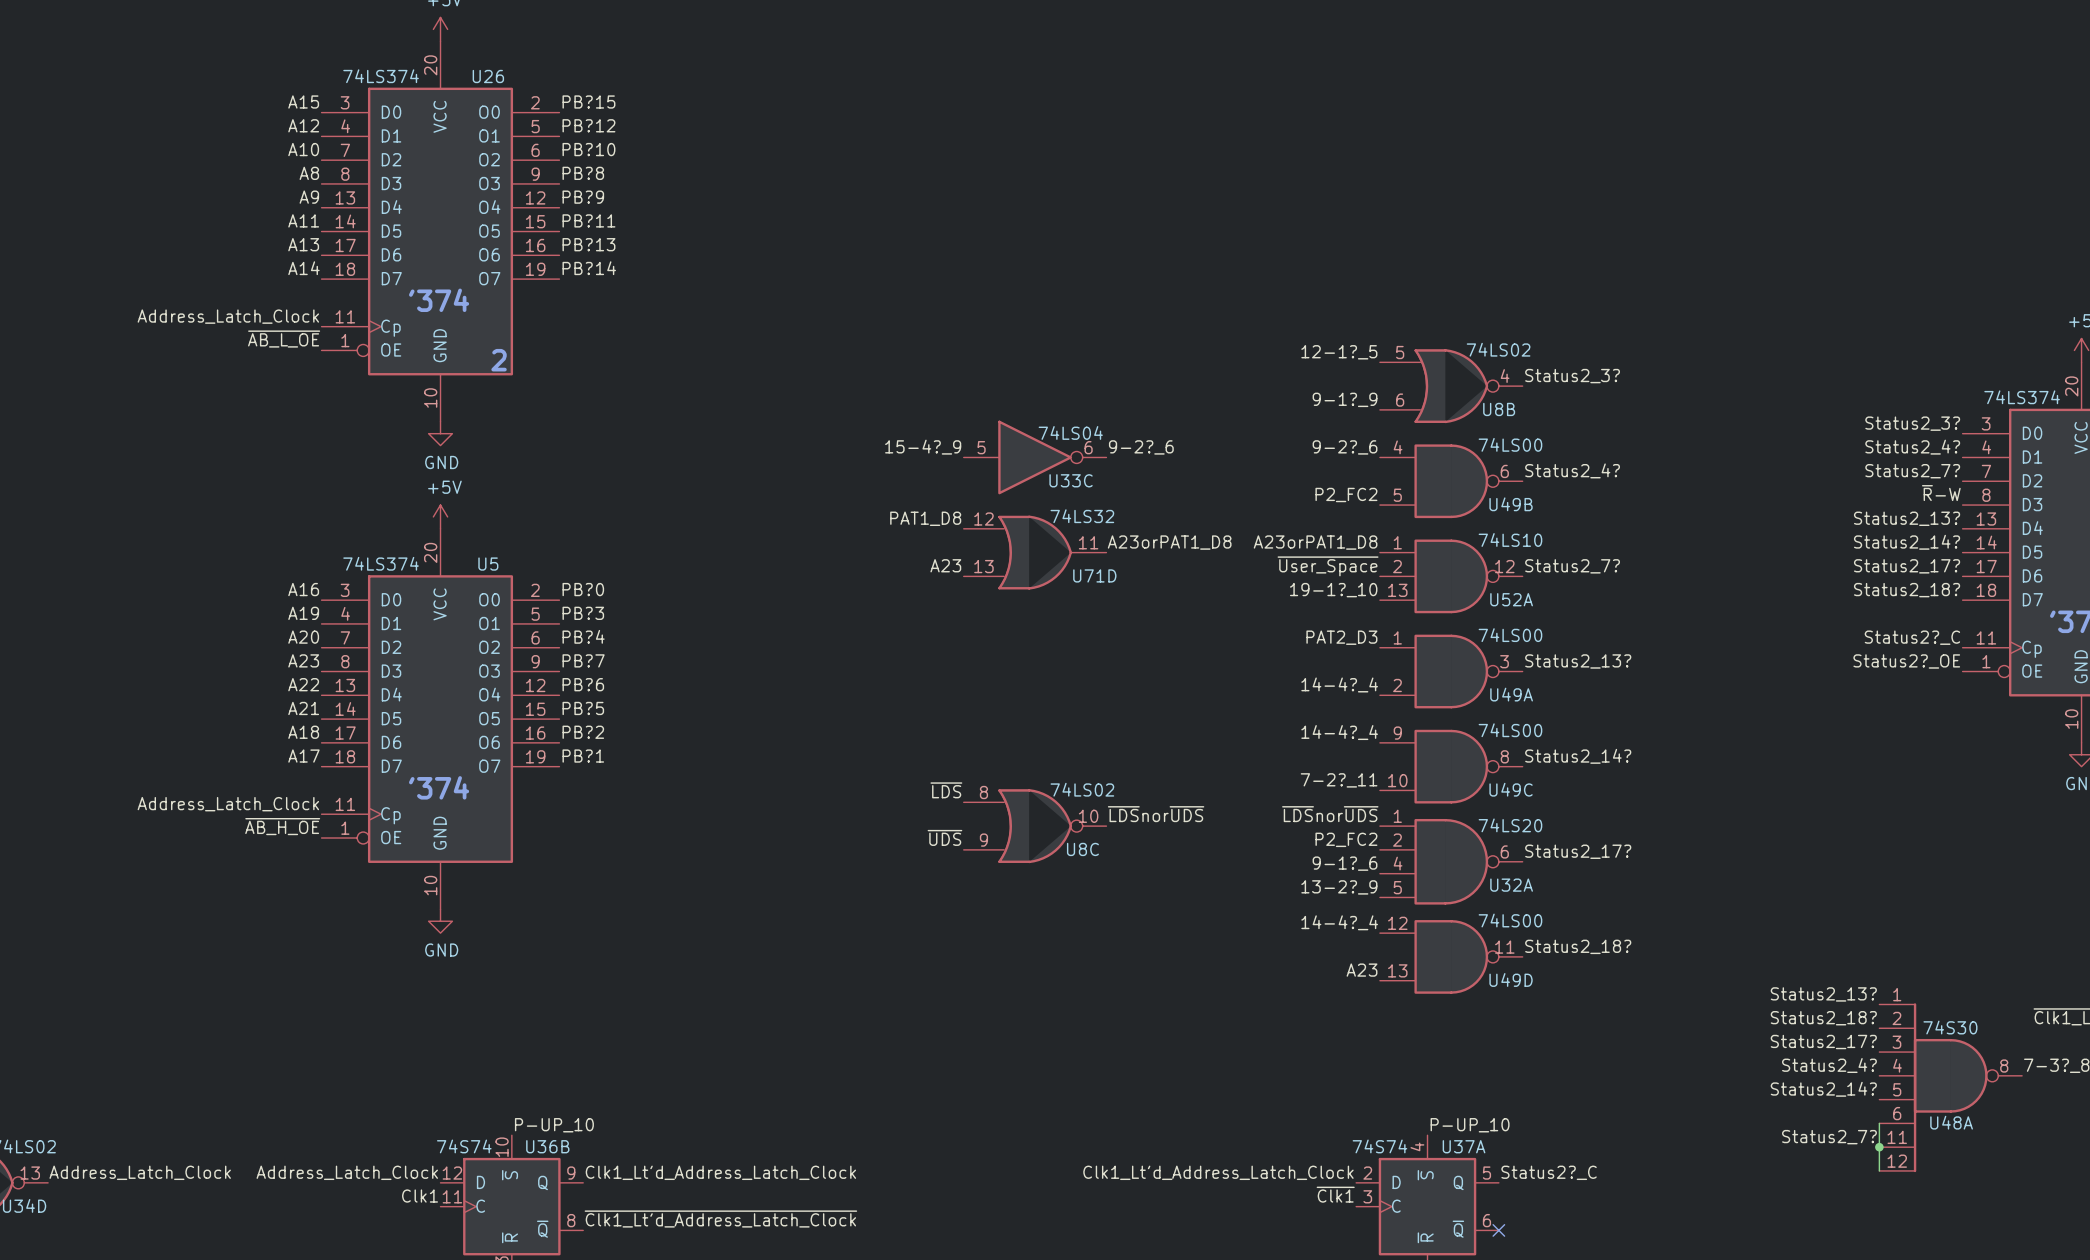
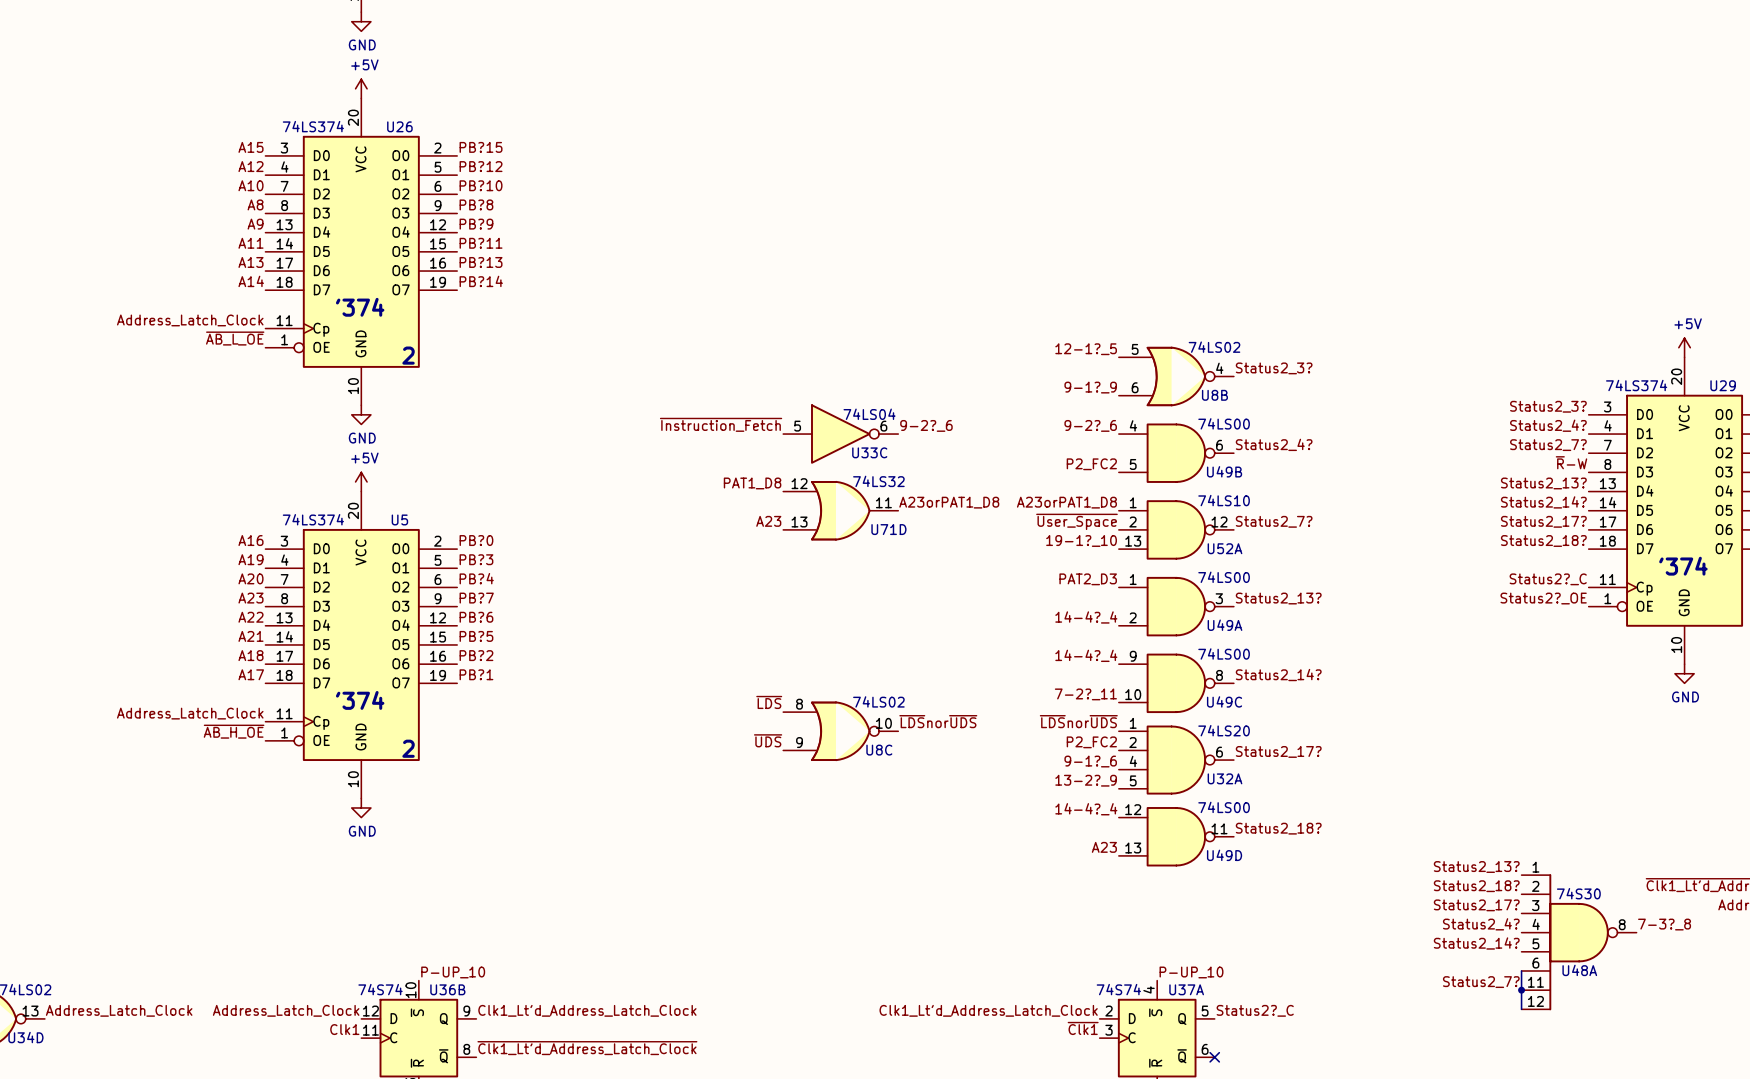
label: 15-4?_9 (923, 447) -> ~{Instruction_Fetch} (721, 424)
text: none -> 2 (408, 748)

